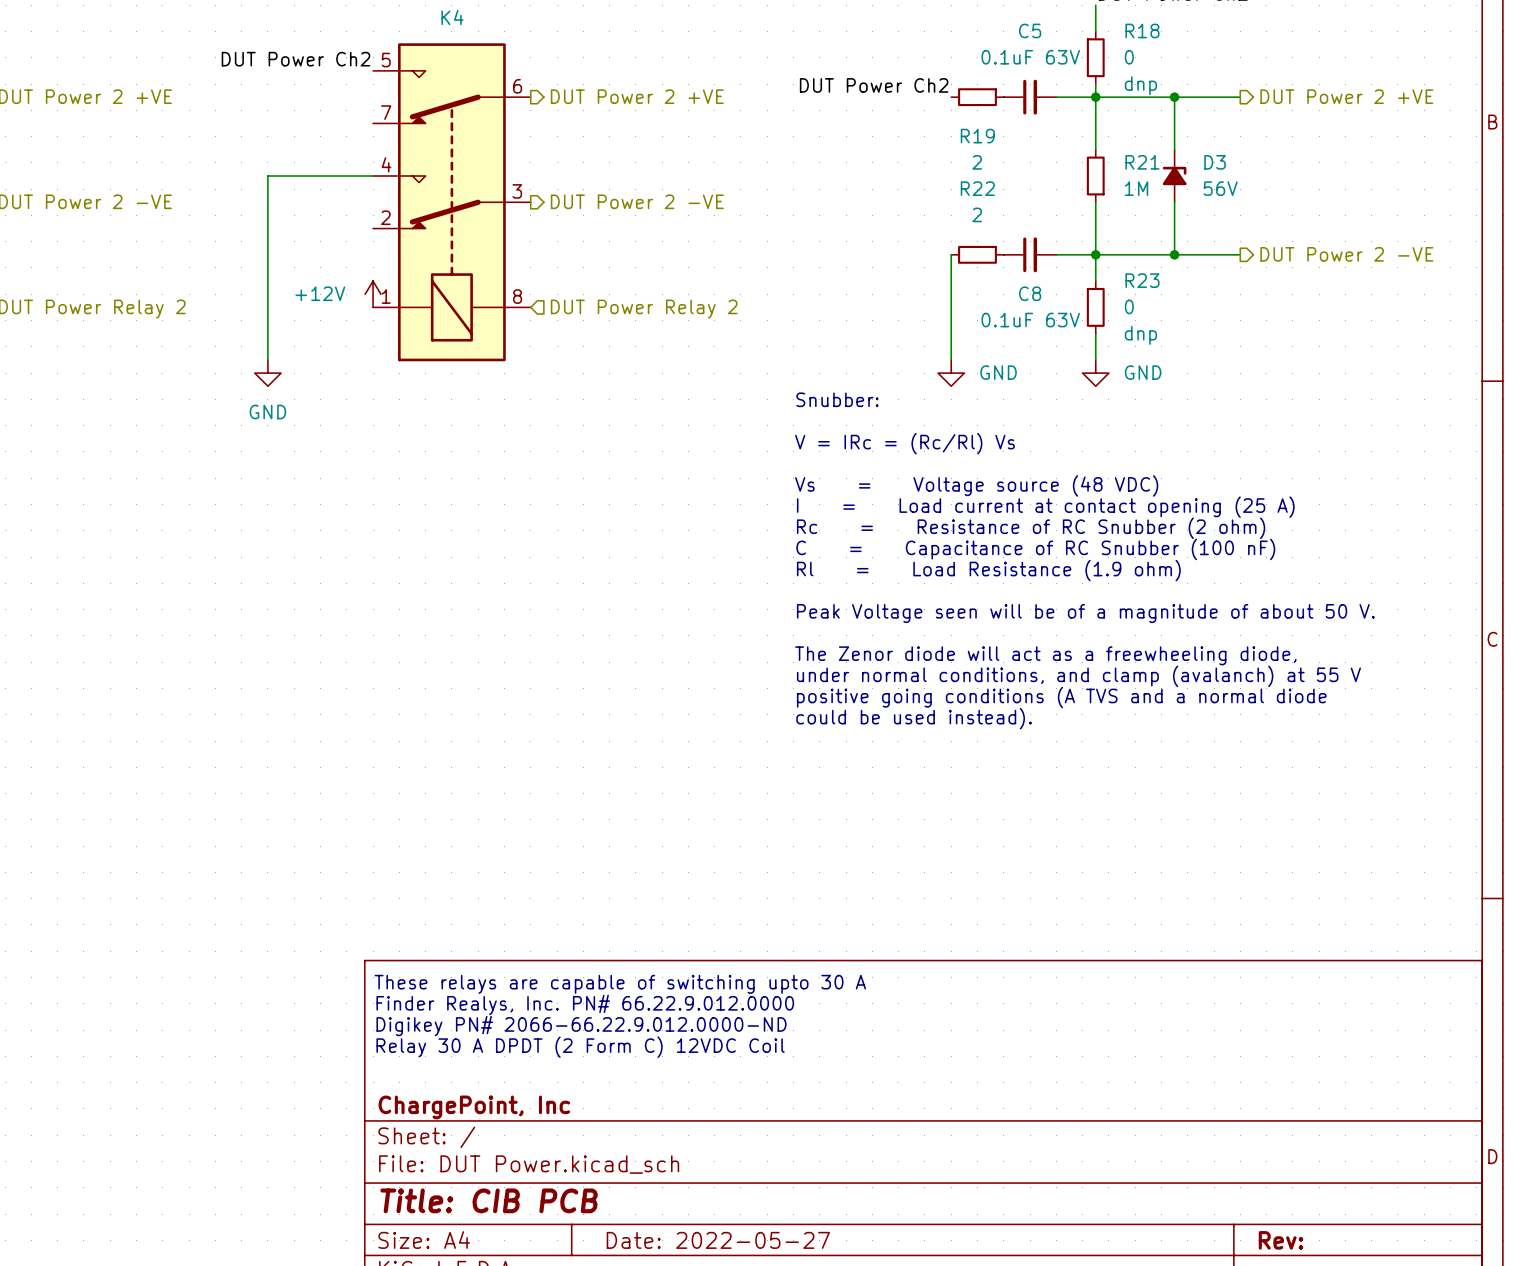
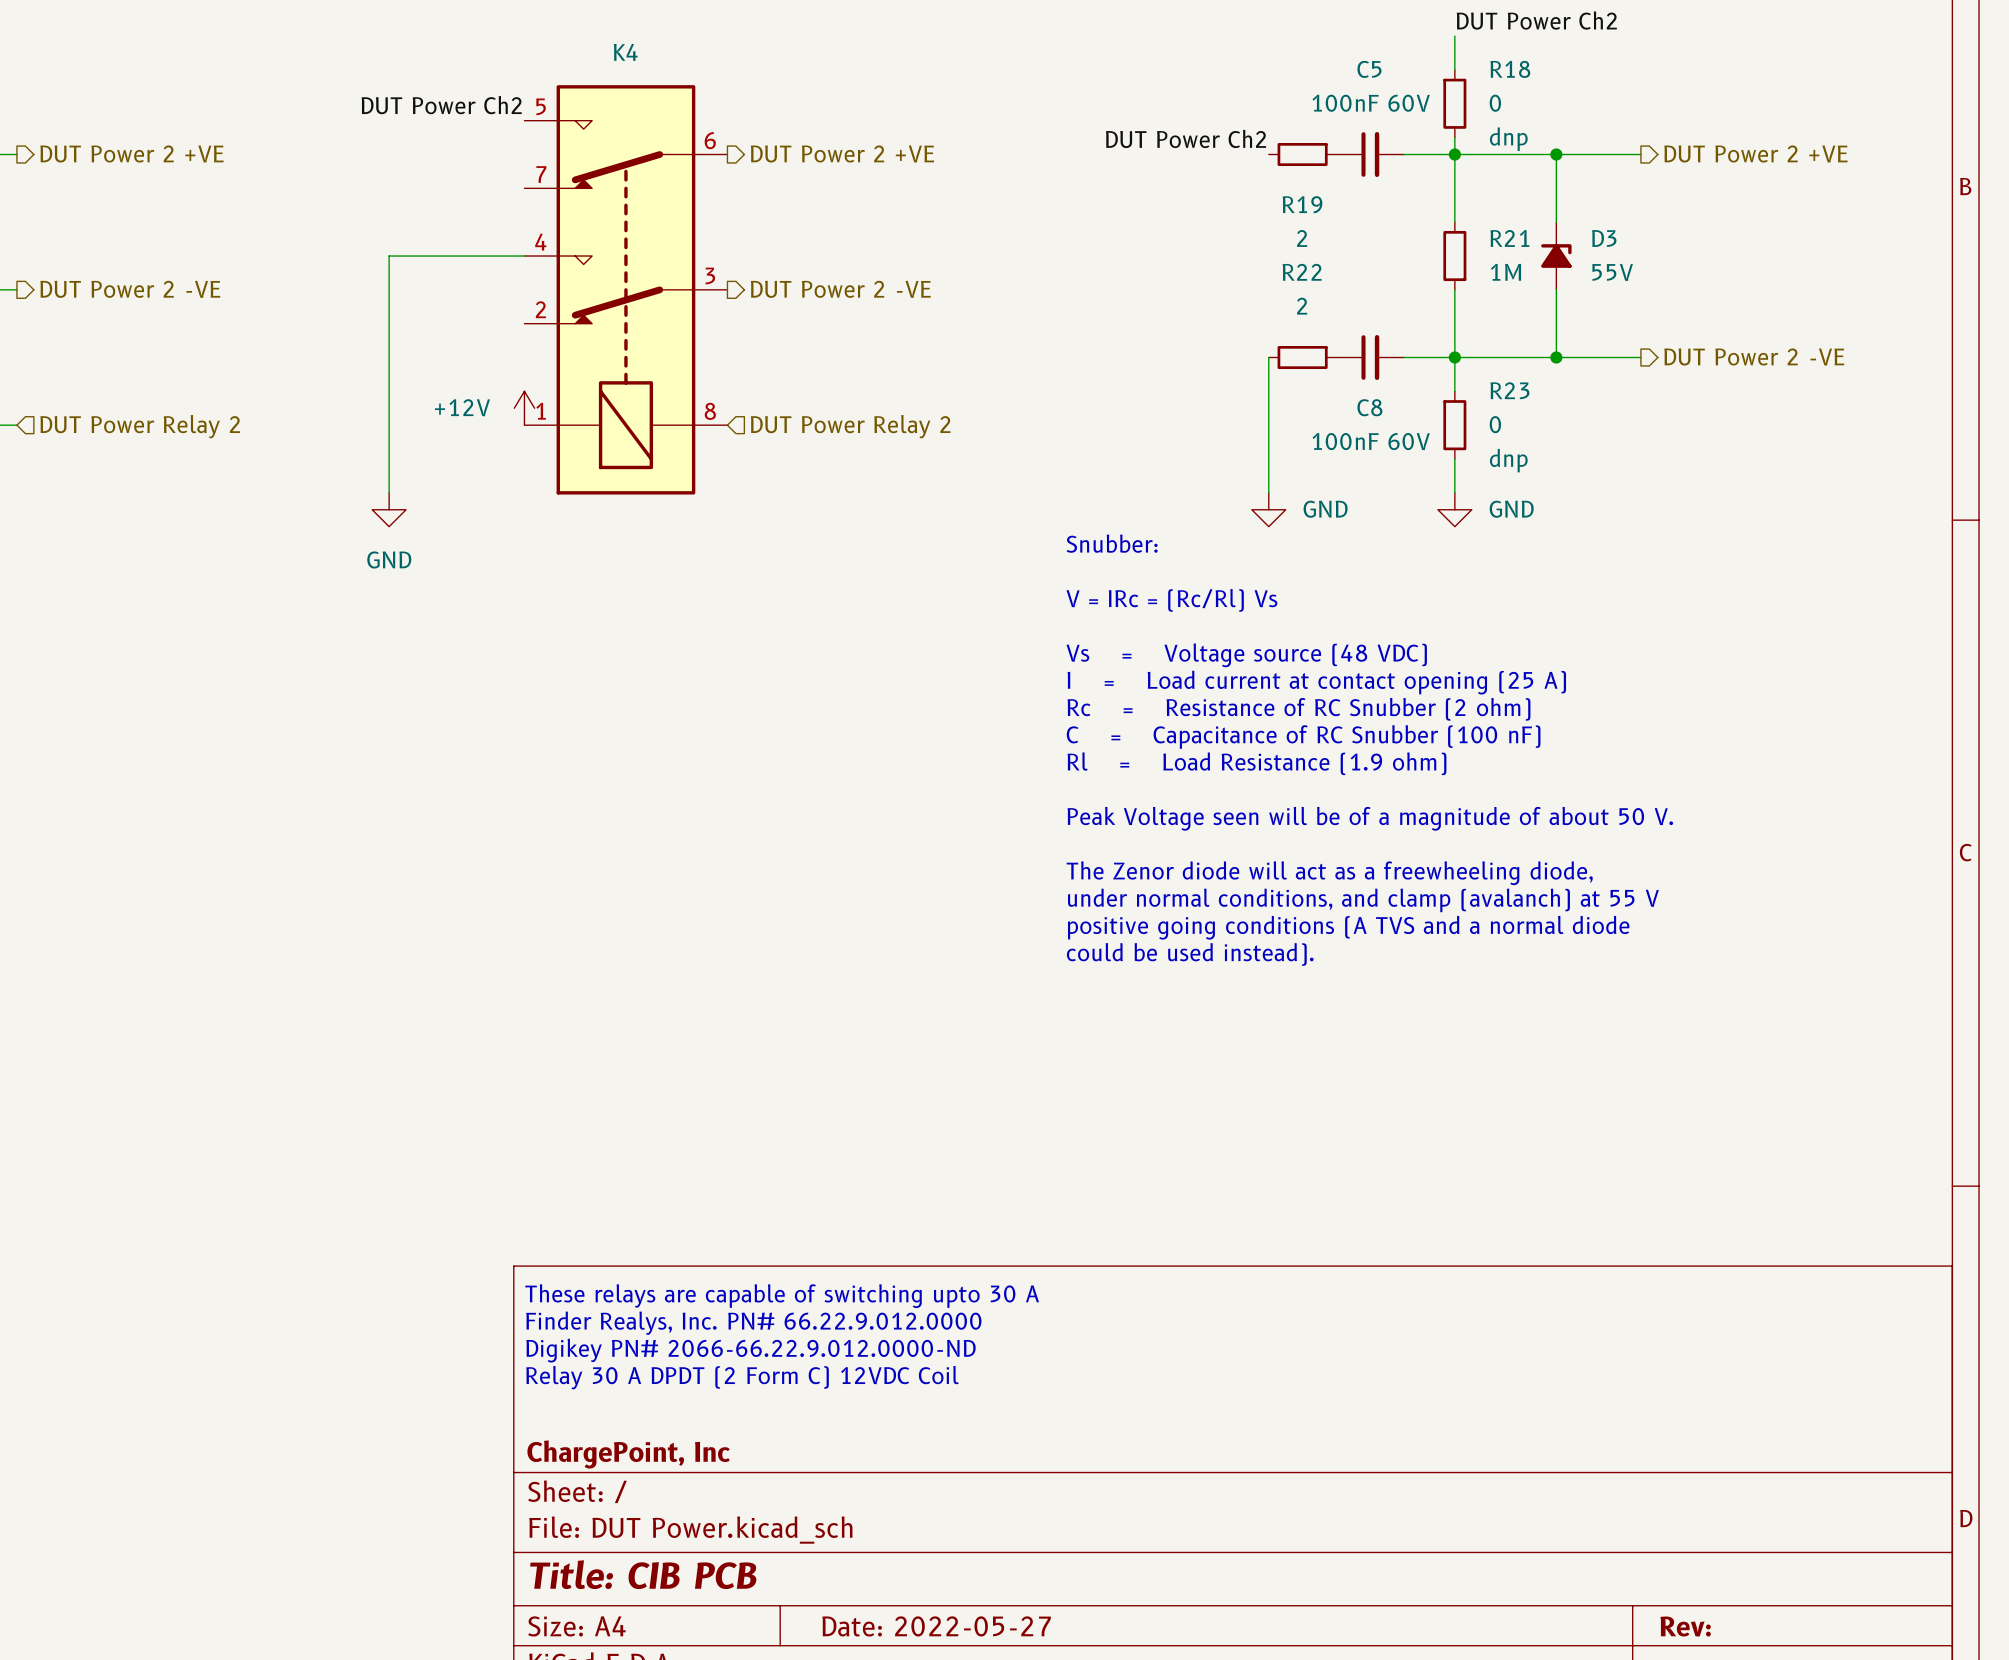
C5 value: 0.1uF 63V (1030, 57) -> 100nF 60V (1371, 103)
D3 value: 56V (1220, 188) -> 55V (1612, 272)
C8 value: 0.1uF 63V (1030, 320) -> 100nF 60V (1371, 441)

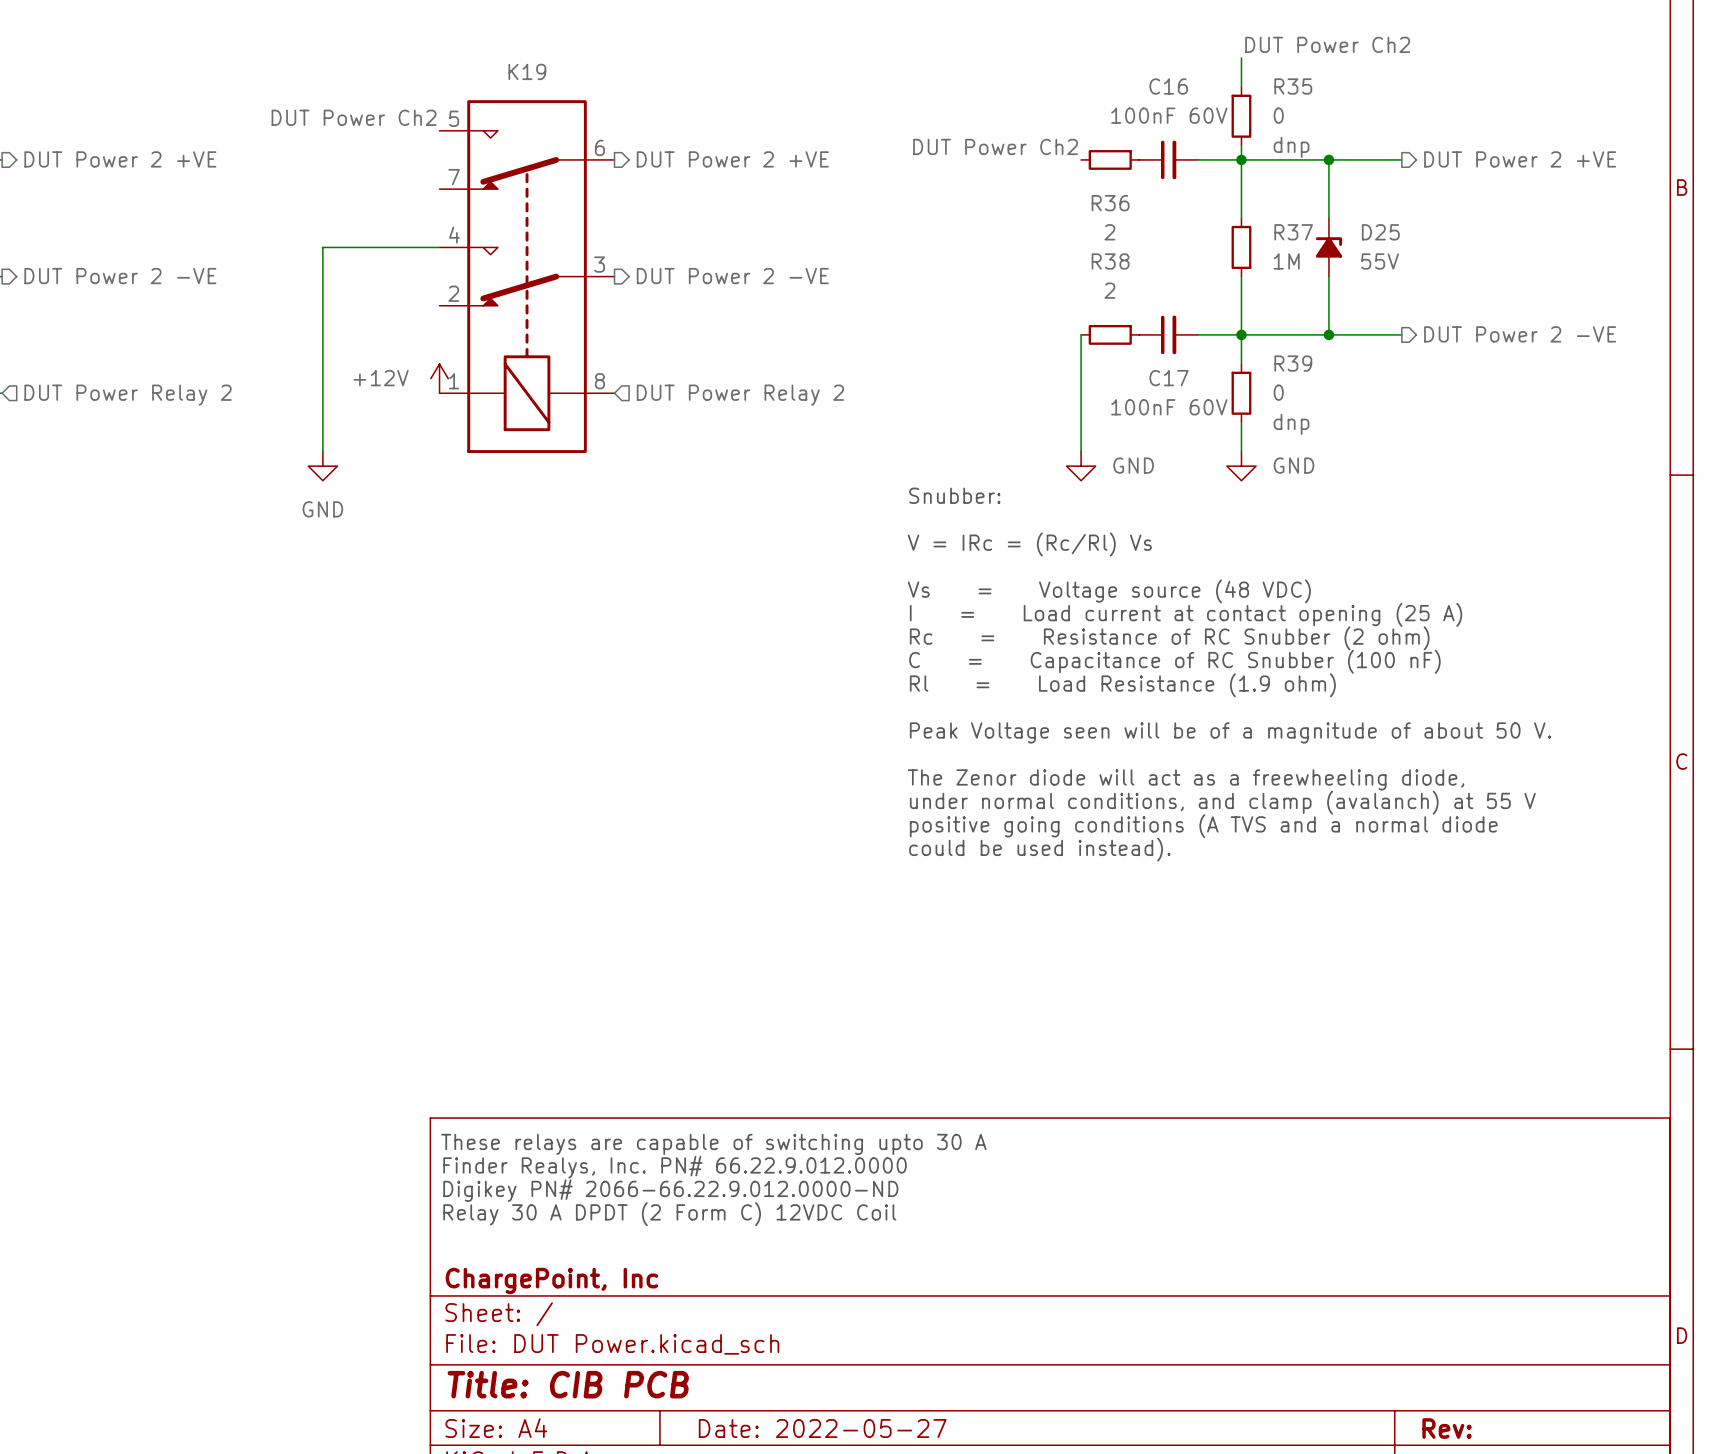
K4 name: K4 (625, 52) -> K19 (527, 71)
C5 name: C5 (1369, 69) -> C16 (1168, 86)
R18 name: R18 (1510, 69) -> R35 (1293, 86)
R19 name: R19 (1302, 204) -> R36 (1110, 203)
R21 name: R21 (1509, 238) -> R37 (1293, 232)
D3 name: D3 (1604, 238) -> D25 (1380, 232)
R22 name: R22 (1302, 272) -> R38 (1110, 261)
R23 name: R23 (1509, 390) -> R39 (1293, 363)
C8 name: C8 (1369, 407) -> C17 (1168, 378)

